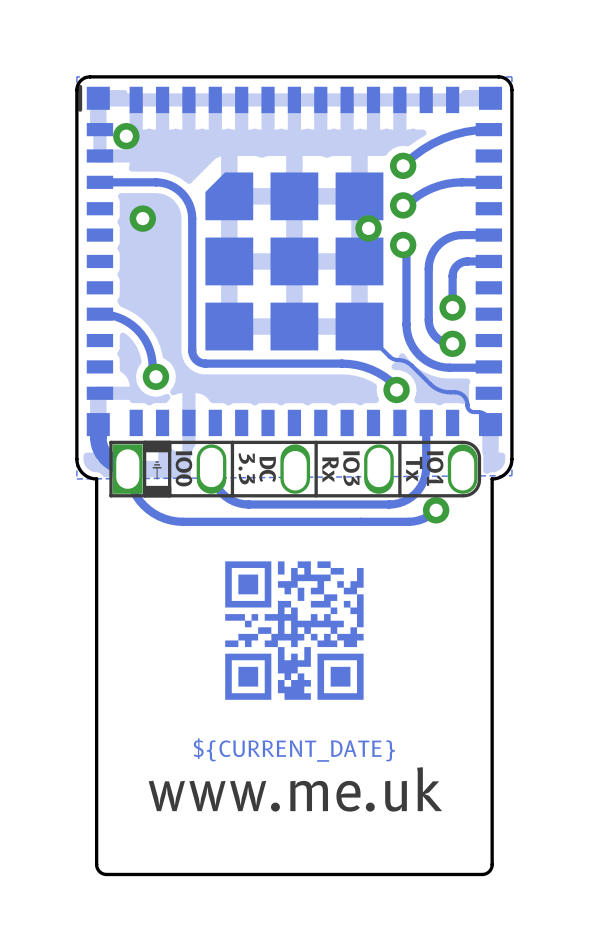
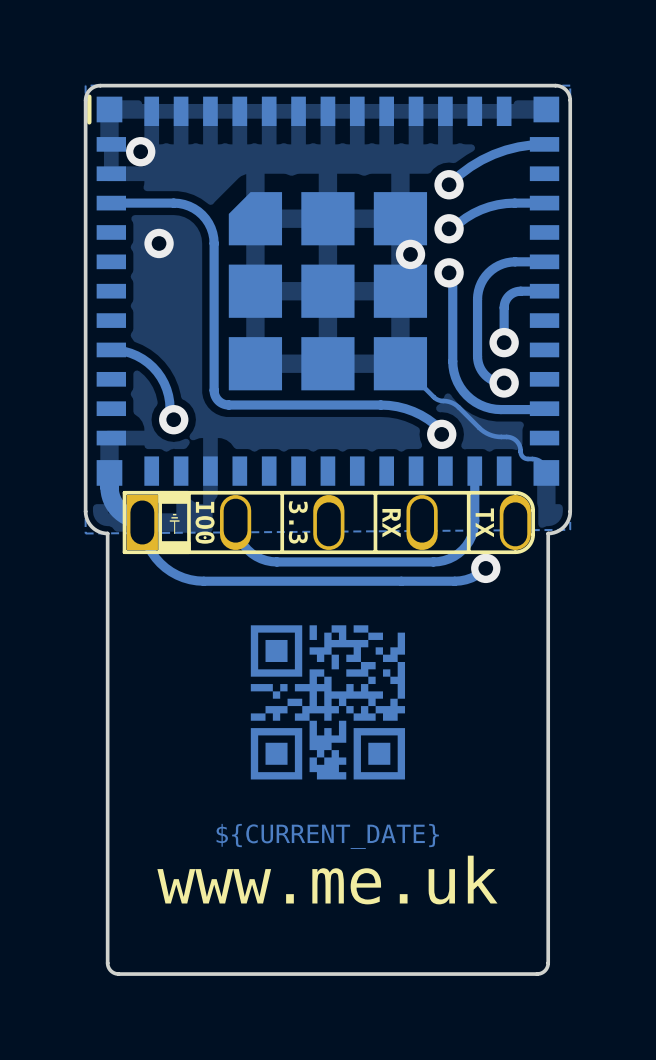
part footprint: [109, 440, 482, 498] -> [122, 490, 535, 555]

